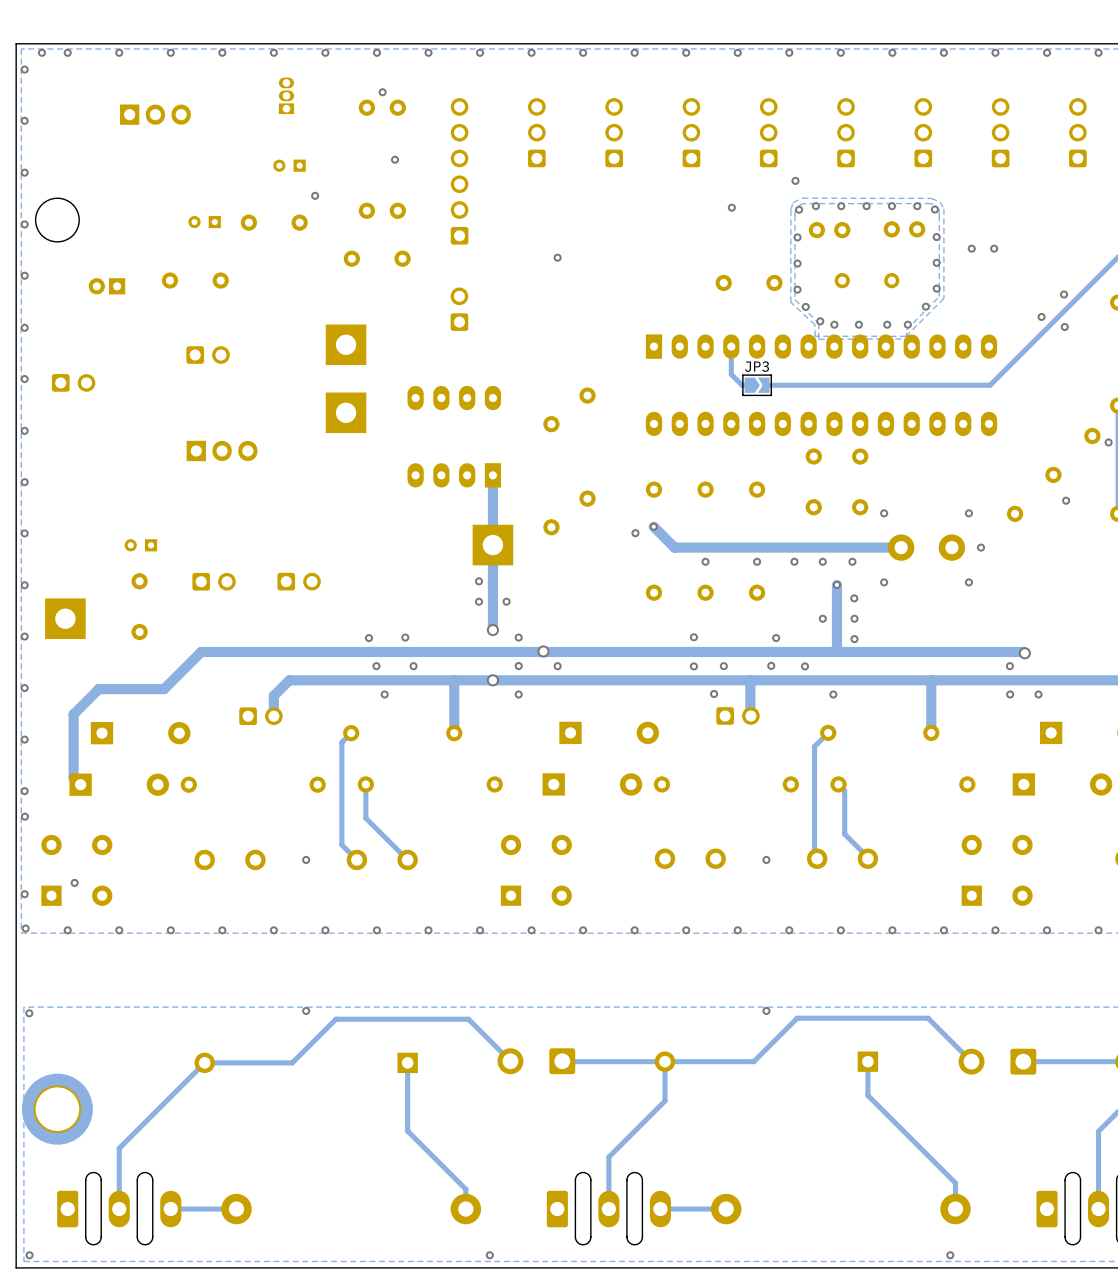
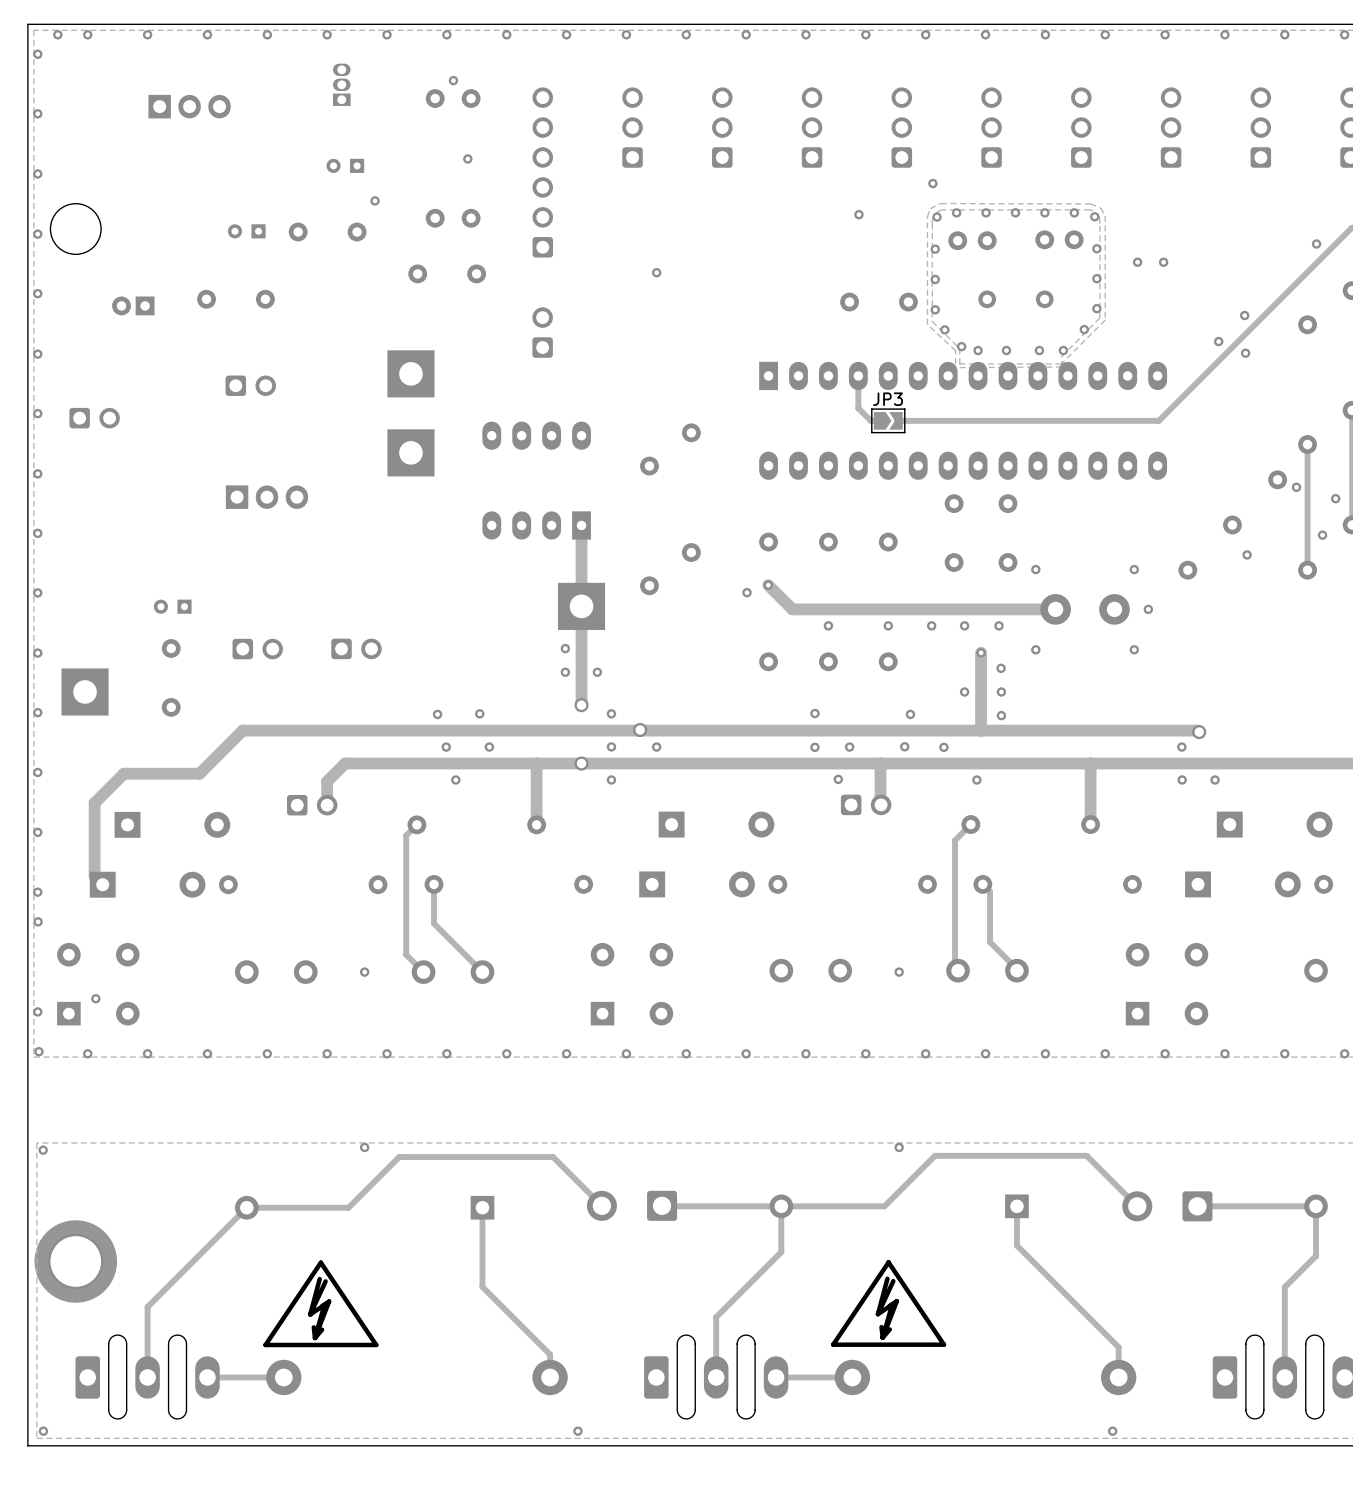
drawing: none -> [263, 1260, 379, 1348]
drawing: none -> [830, 1260, 947, 1347]

